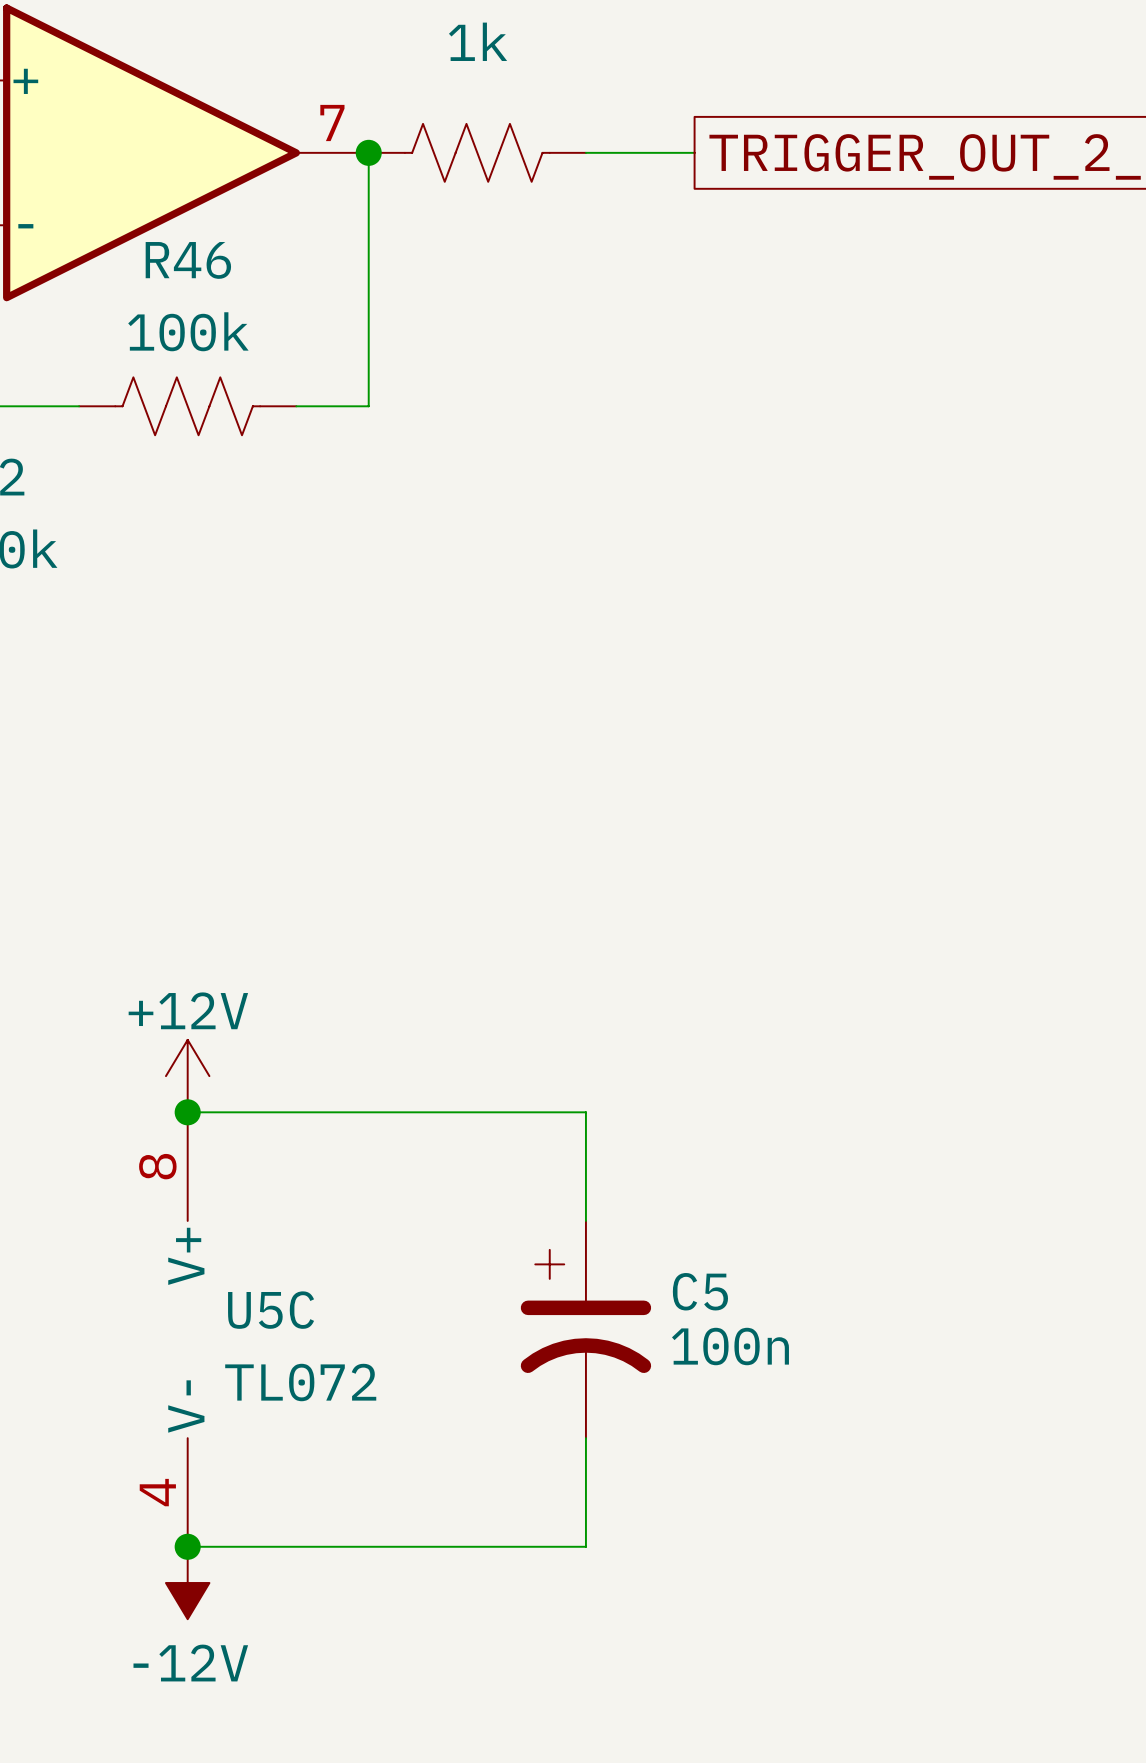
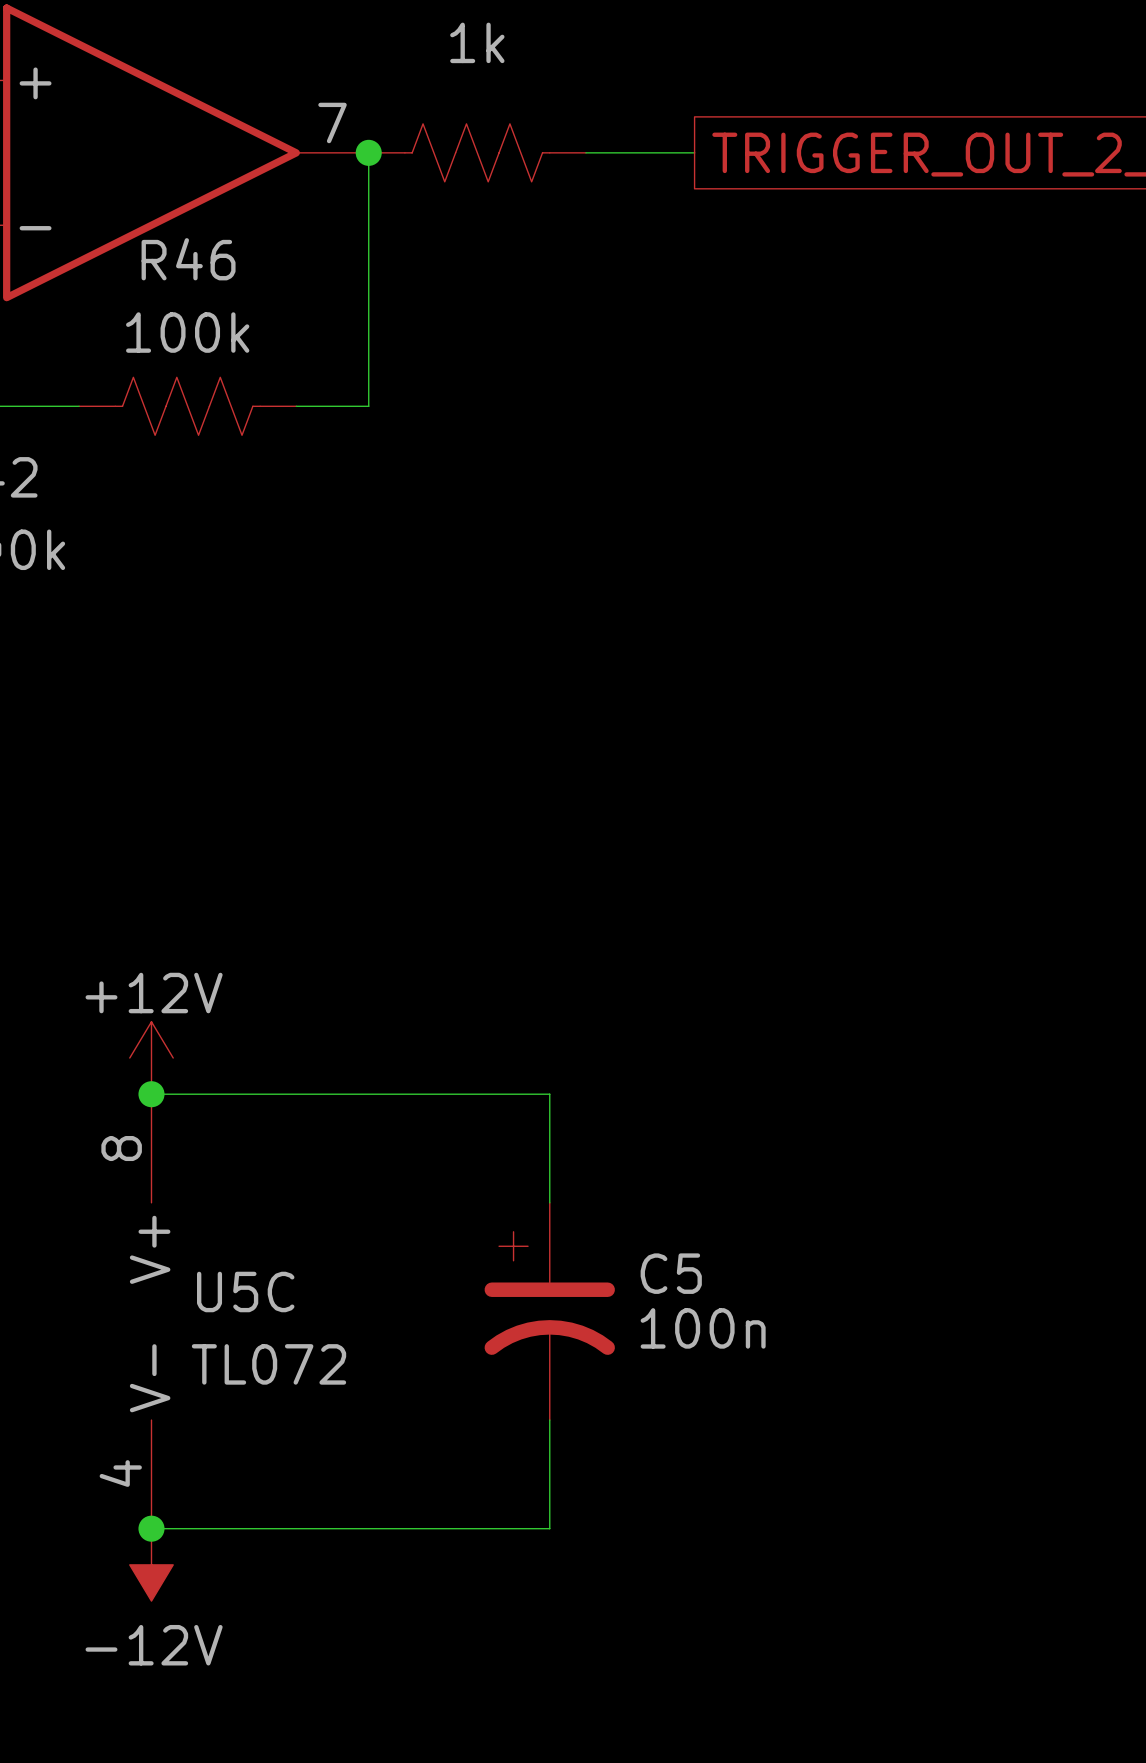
power symbol position: +12V (187, 1076) -> +12V (151, 1058)
wire: (187, 1112) (585, 1112) (585, 1220) -> (151, 1094) (549, 1094) (549, 1202)
junction position: (187, 1112) -> (151, 1094)
U5C position: (187, 1329) -> (151, 1311)
C5 position: (585, 1329) -> (549, 1311)
wire: (585, 1438) (585, 1546) (187, 1546) -> (549, 1420) (549, 1528) (151, 1528)
junction position: (187, 1546) -> (151, 1528)
power symbol position: -12V (187, 1582) -> -12V (151, 1564)

